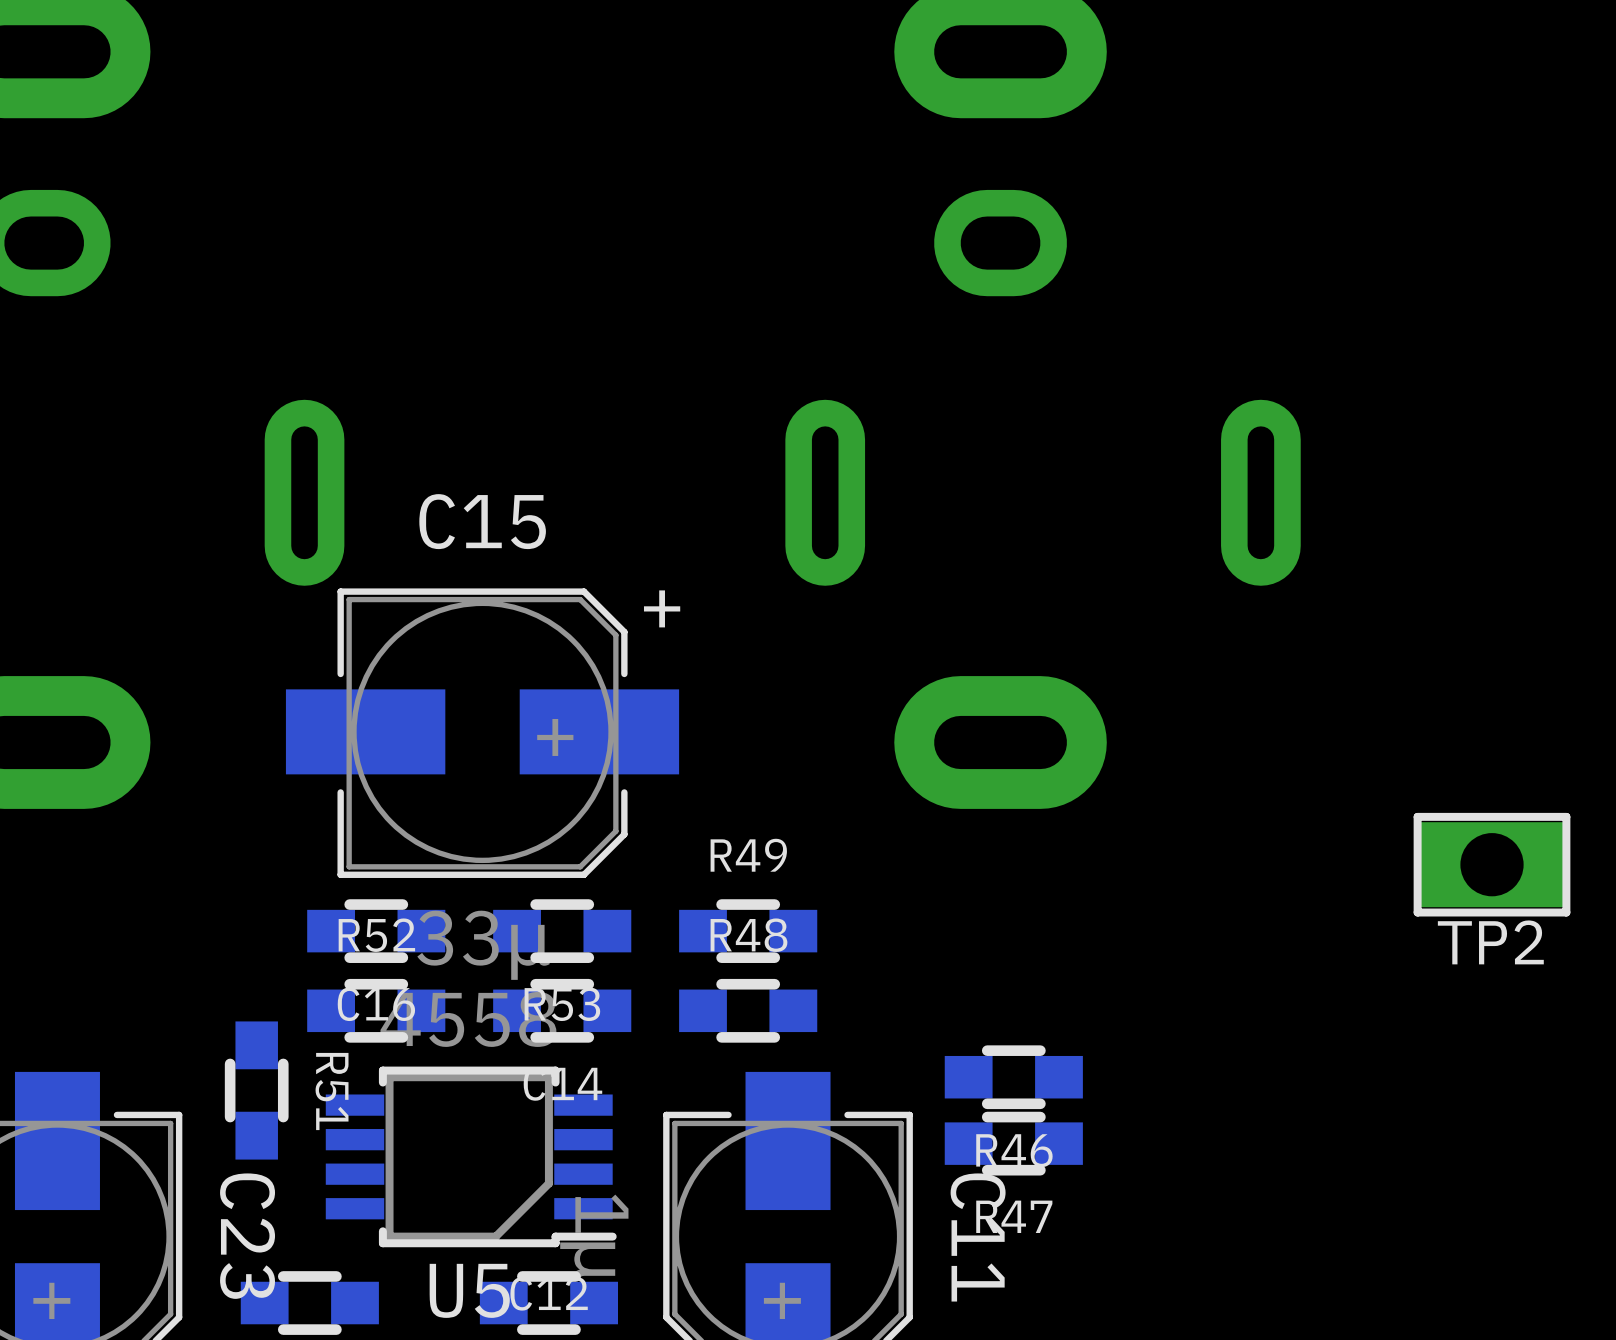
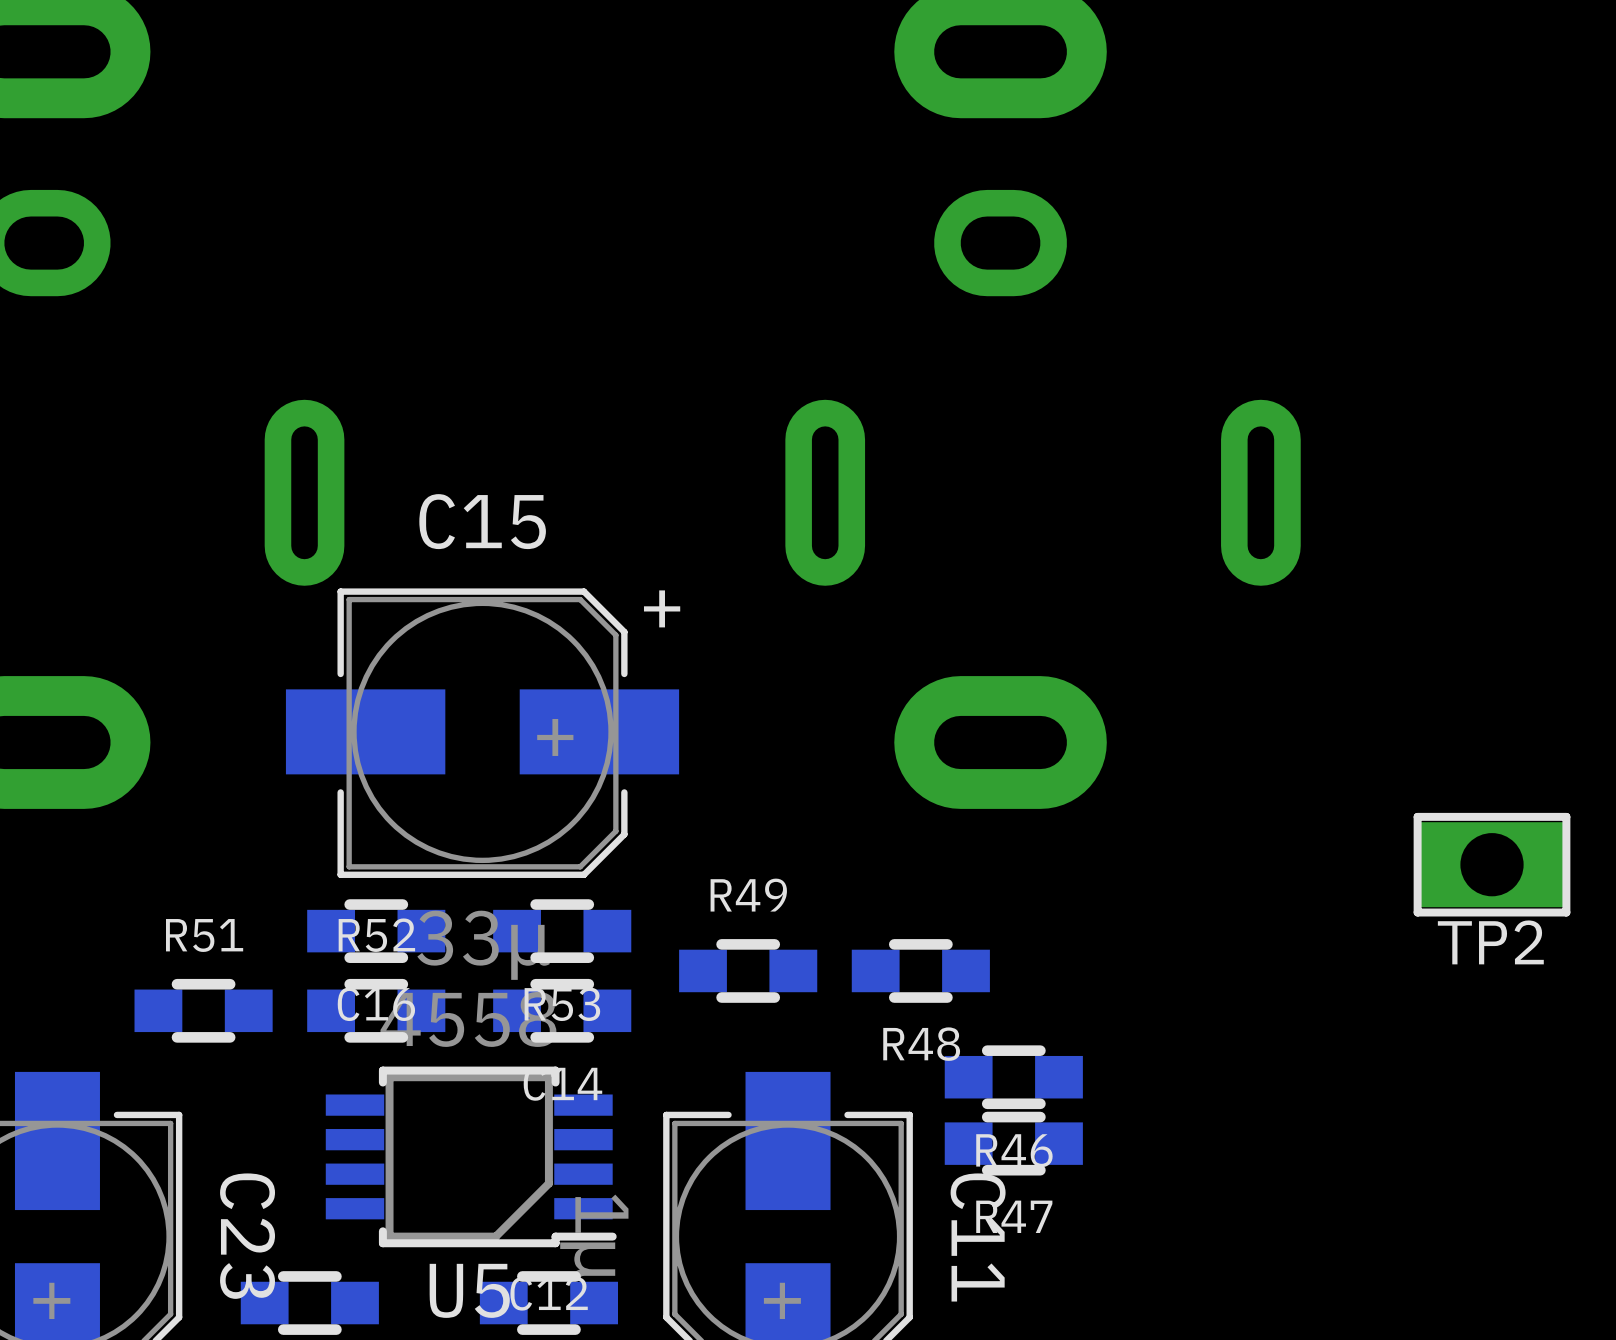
R49 position: (748, 931) -> (748, 970)
R48 name position: R48 (748, 935) -> R48 (921, 1044)
R48 position: (748, 1010) -> (920, 970)
R51 rotation: 0° (256, 1090) -> 90° clockwise (203, 1010)
R51 position: (256, 1090) -> (203, 1010)

